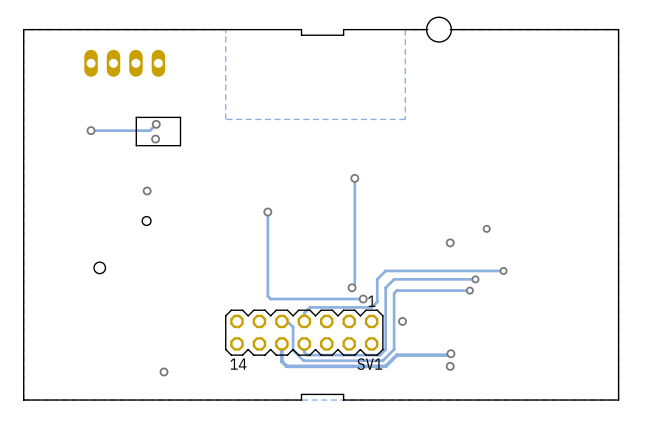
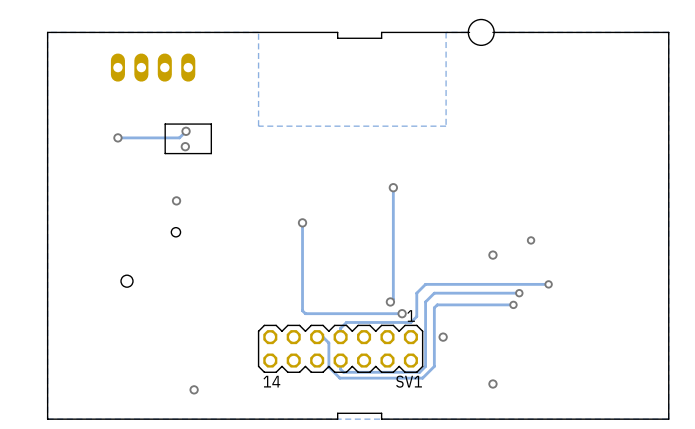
track: (281, 343) (281, 361) (286, 366) (385, 366) (396, 355) (450, 353) -> none
via: (450, 353) -> none

